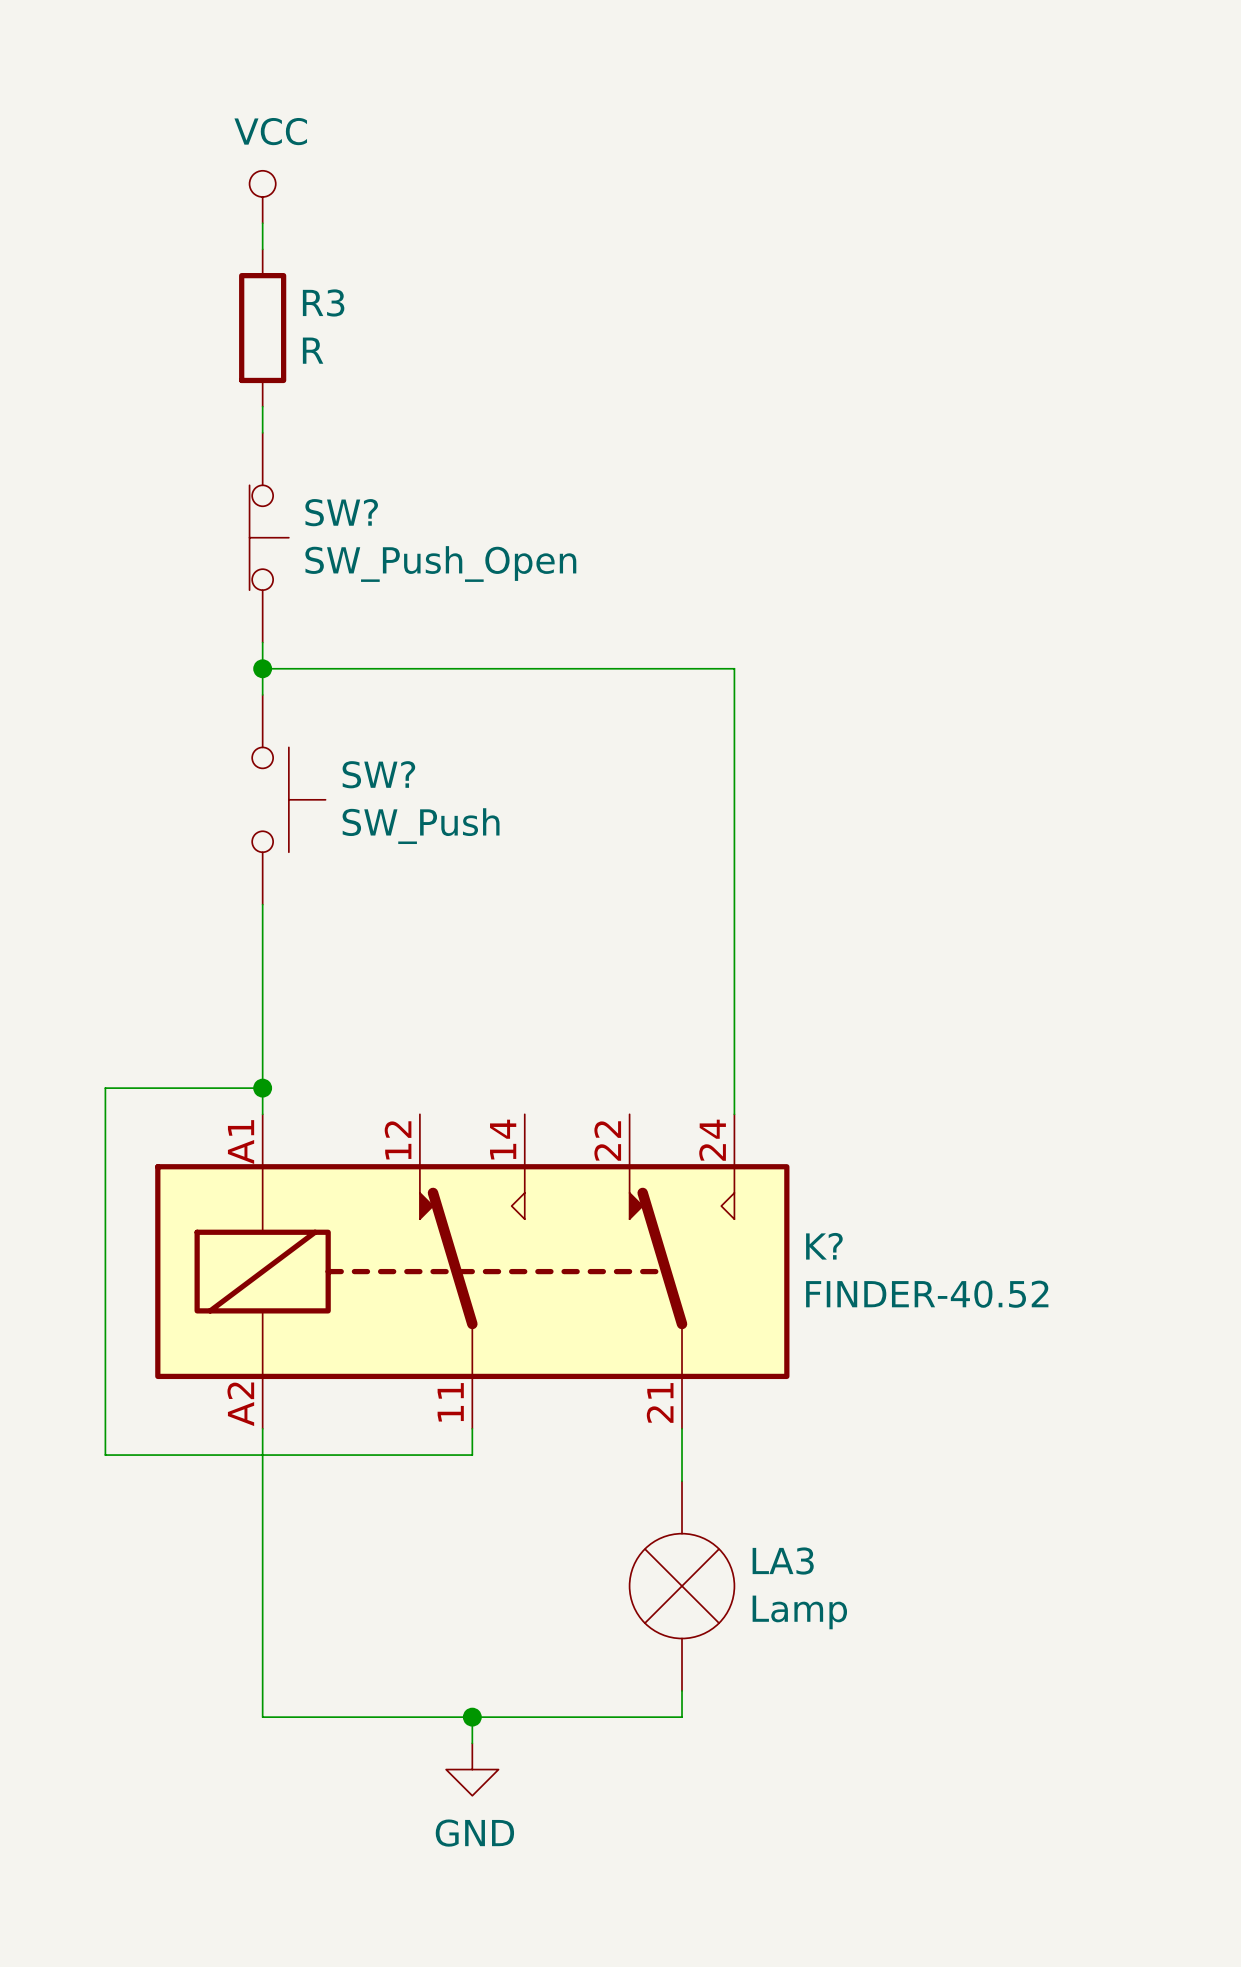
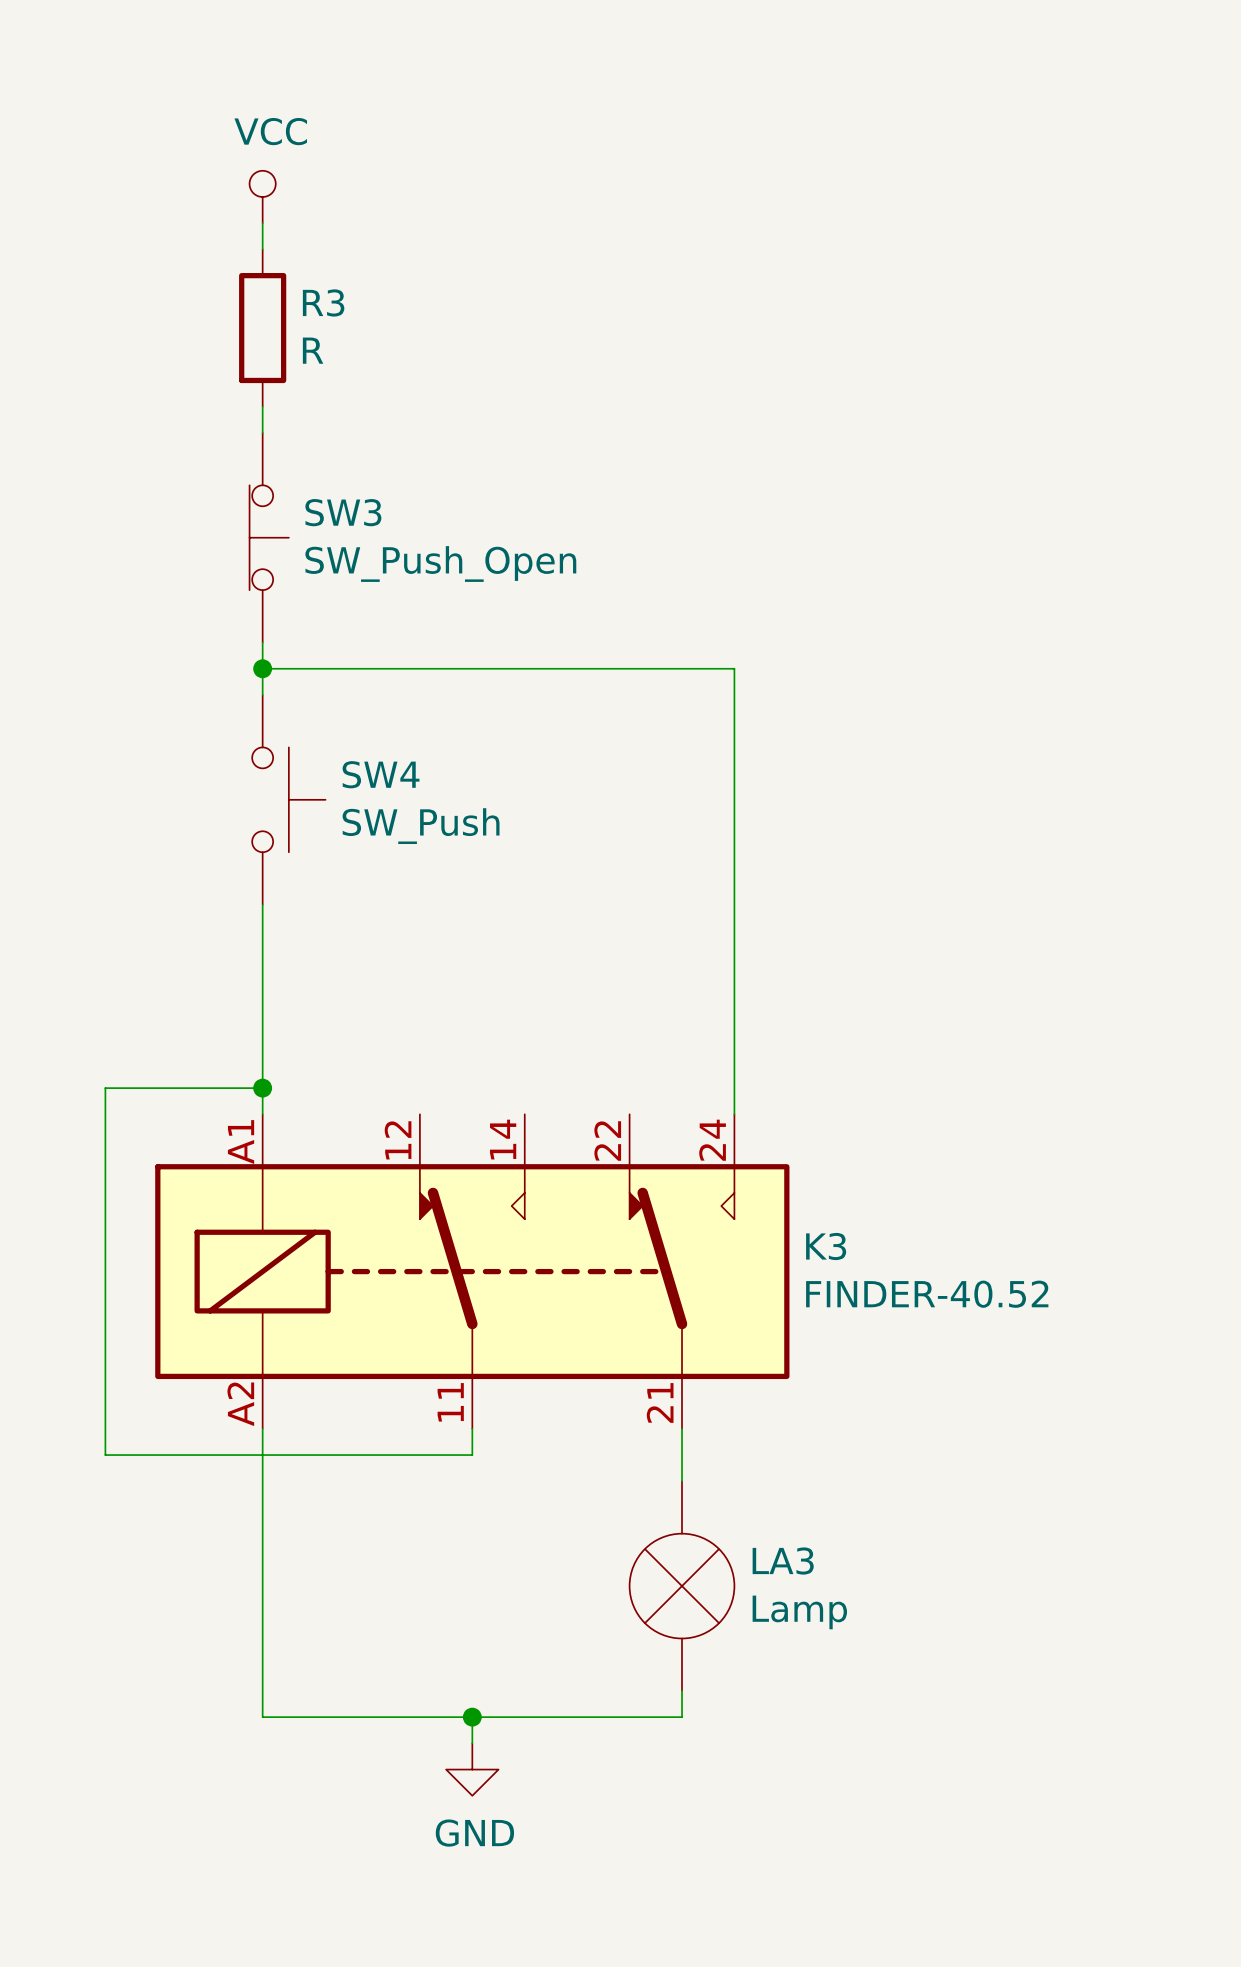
SW? name: SW? (341, 512) -> SW3 (343, 512)
SW? name: SW? (378, 774) -> SW4 (381, 774)
K? name: K? (824, 1246) -> K3 (826, 1246)

